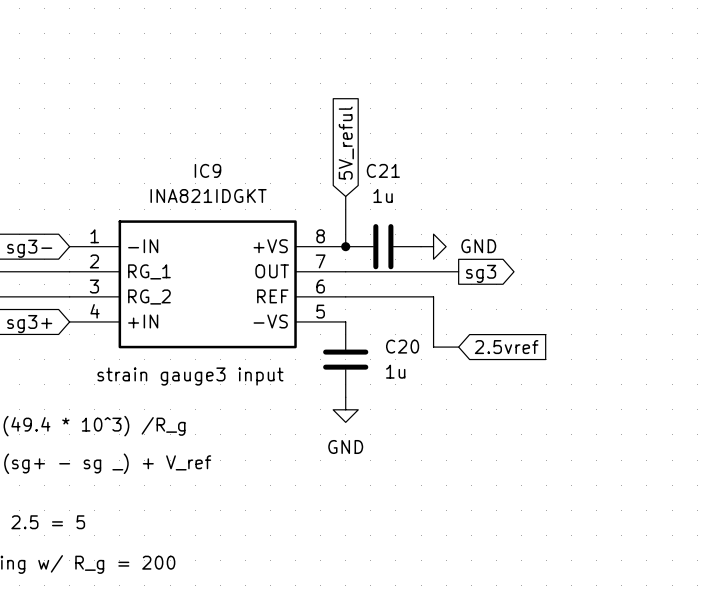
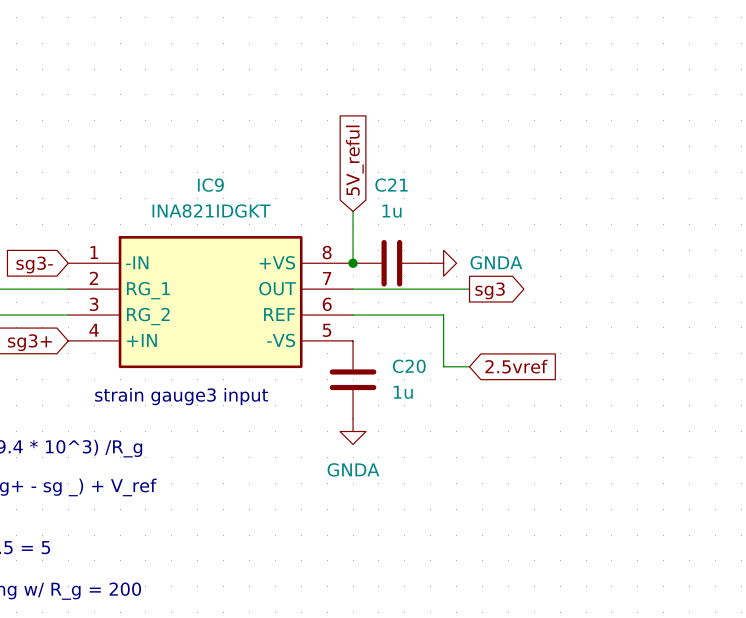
power symbol: GND (433, 246) -> GNDA (443, 263)
power symbol: GND (345, 409) -> GNDA (353, 431)

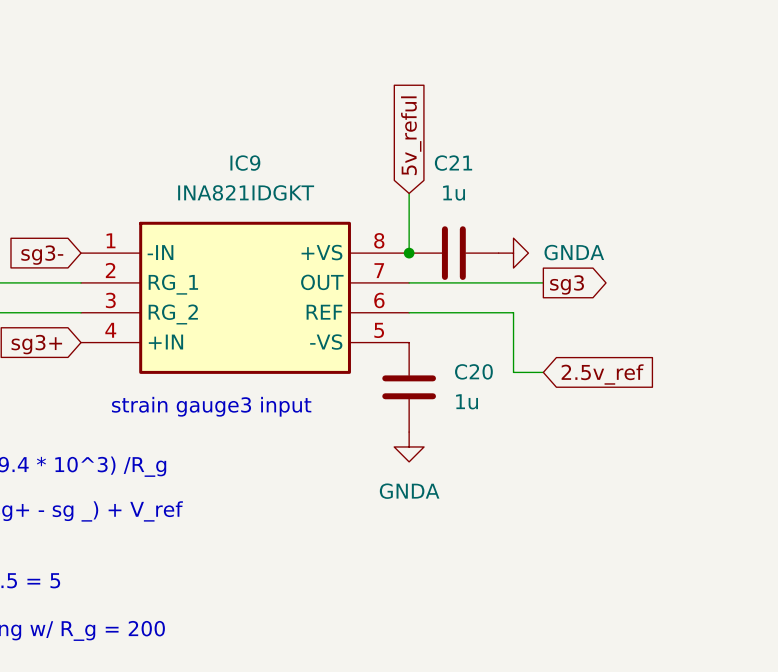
global label: 5V_reful (354, 160) -> 5v_reful (411, 135)
global label: 2.5vref (516, 366) -> 2.5v_ref (602, 374)

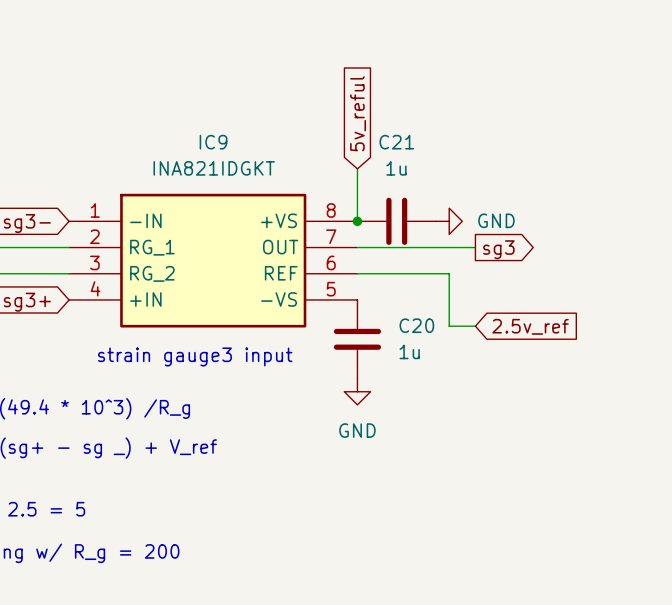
power symbol: GNDA (513, 253) -> GND (449, 221)
power symbol: GNDA (409, 446) -> GND (357, 391)

